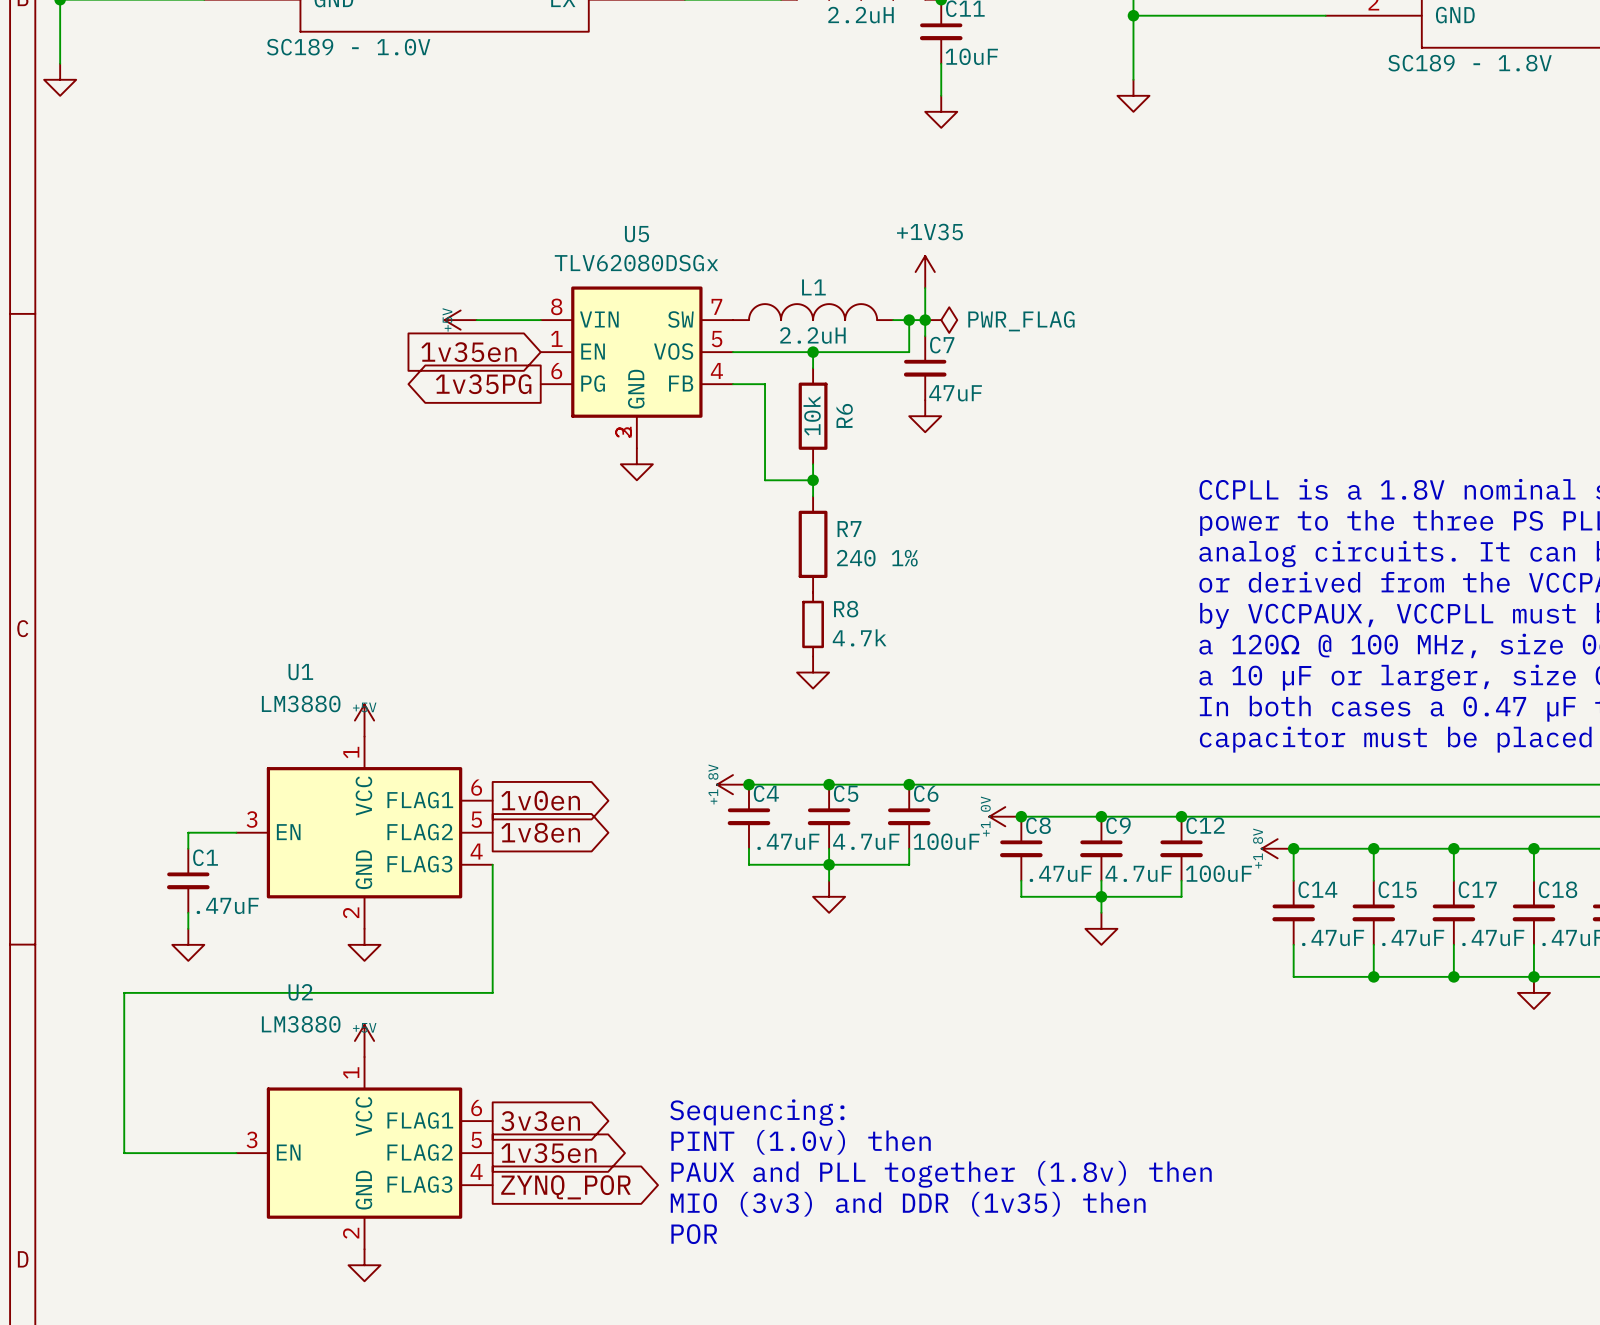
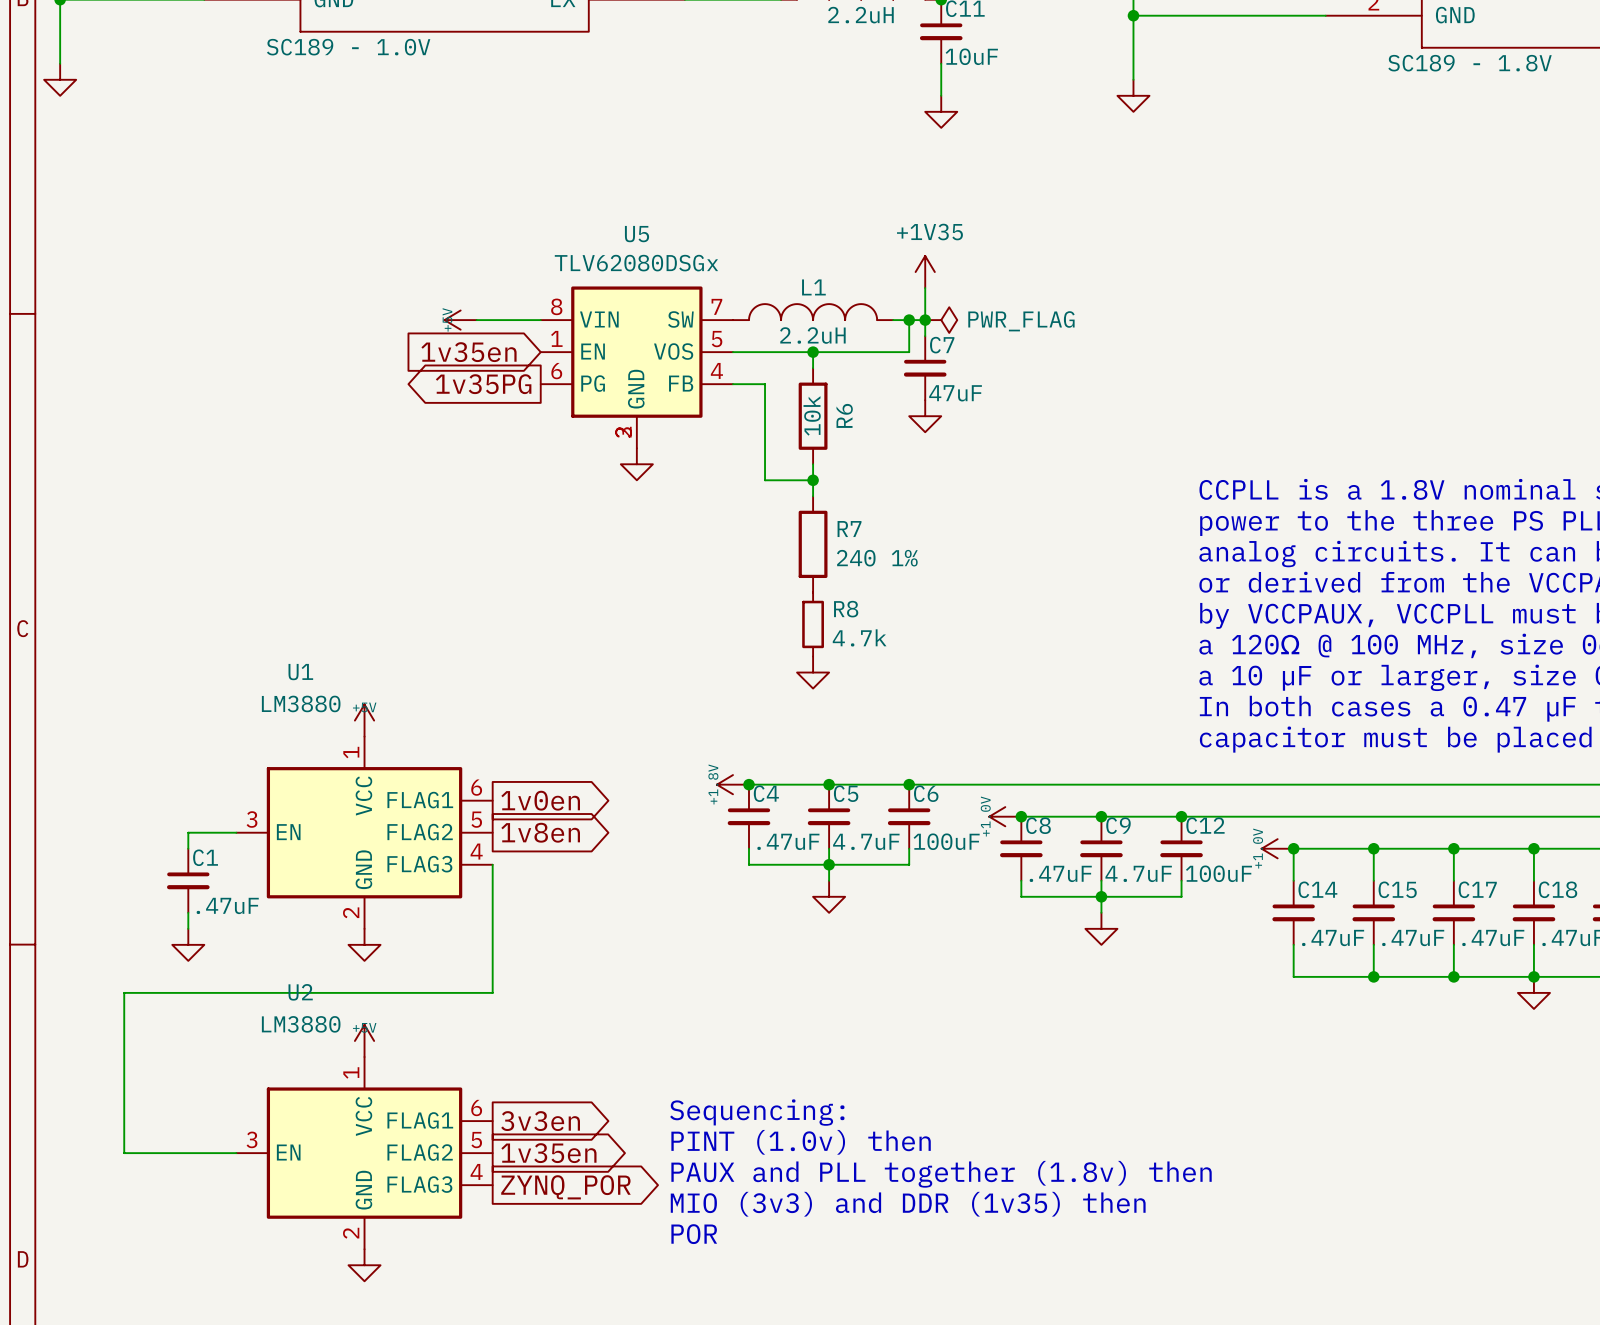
power symbol: +1.8V (1277, 848) -> +1.0V (1277, 848)

